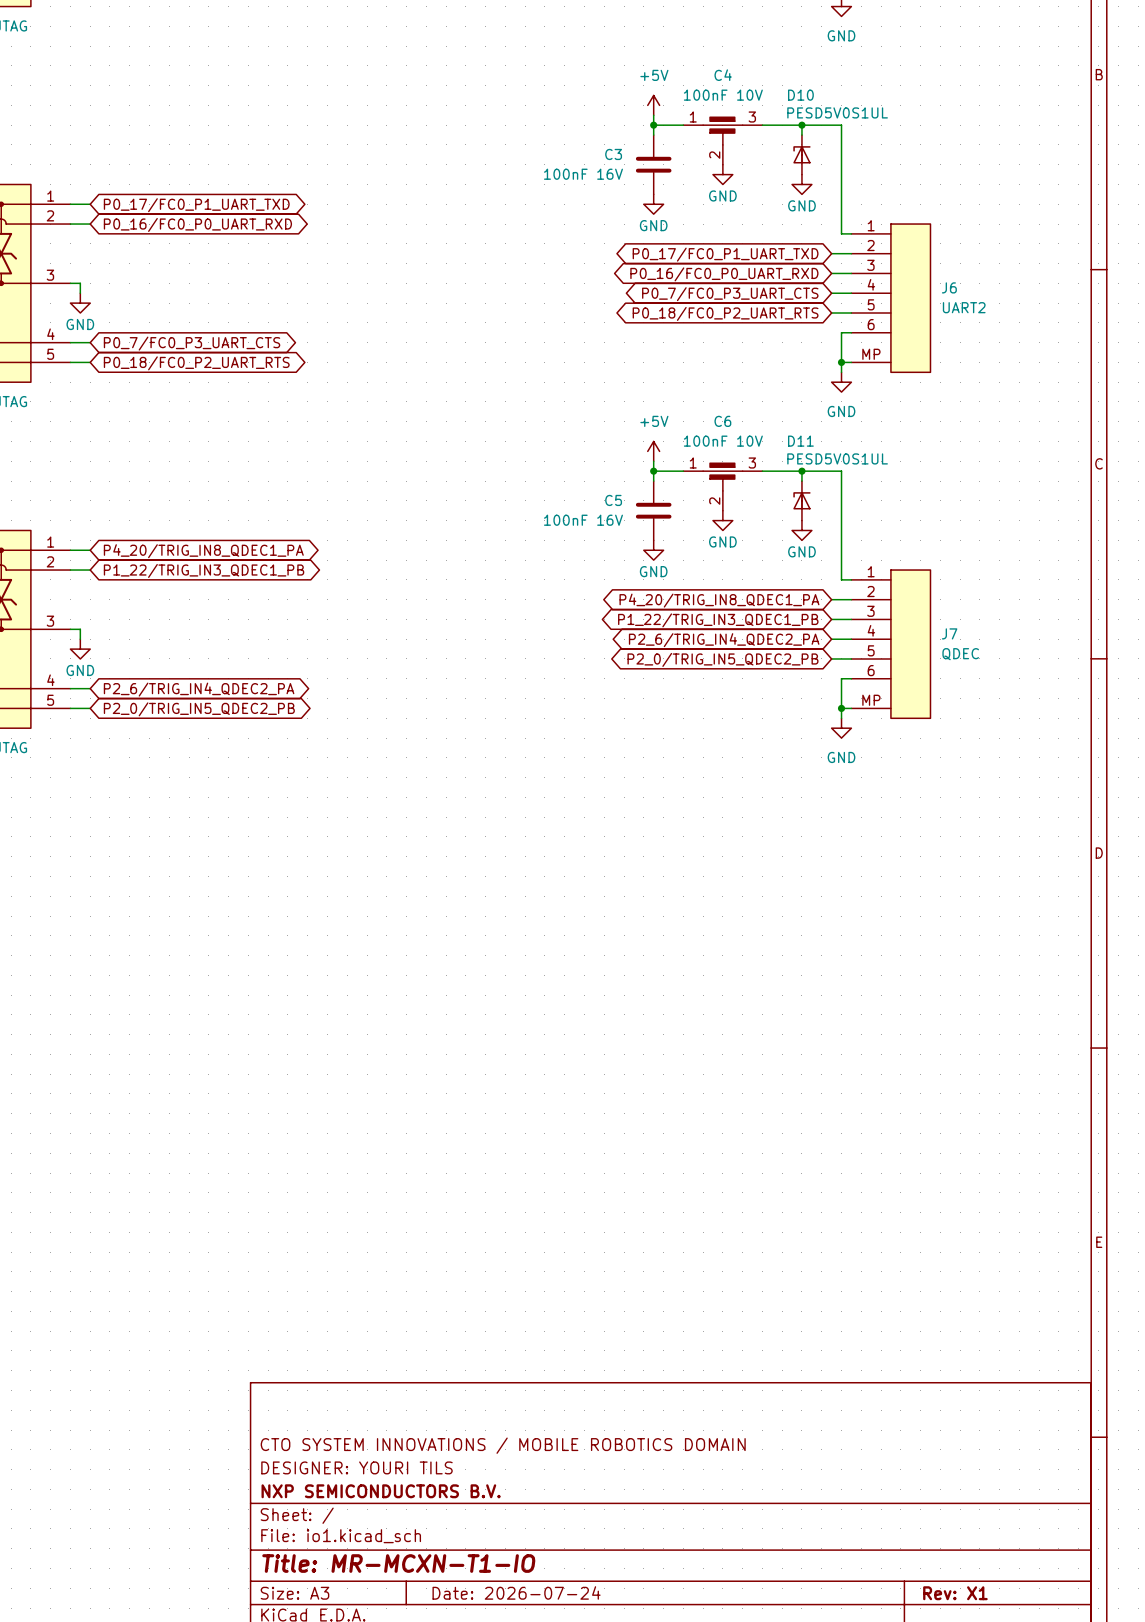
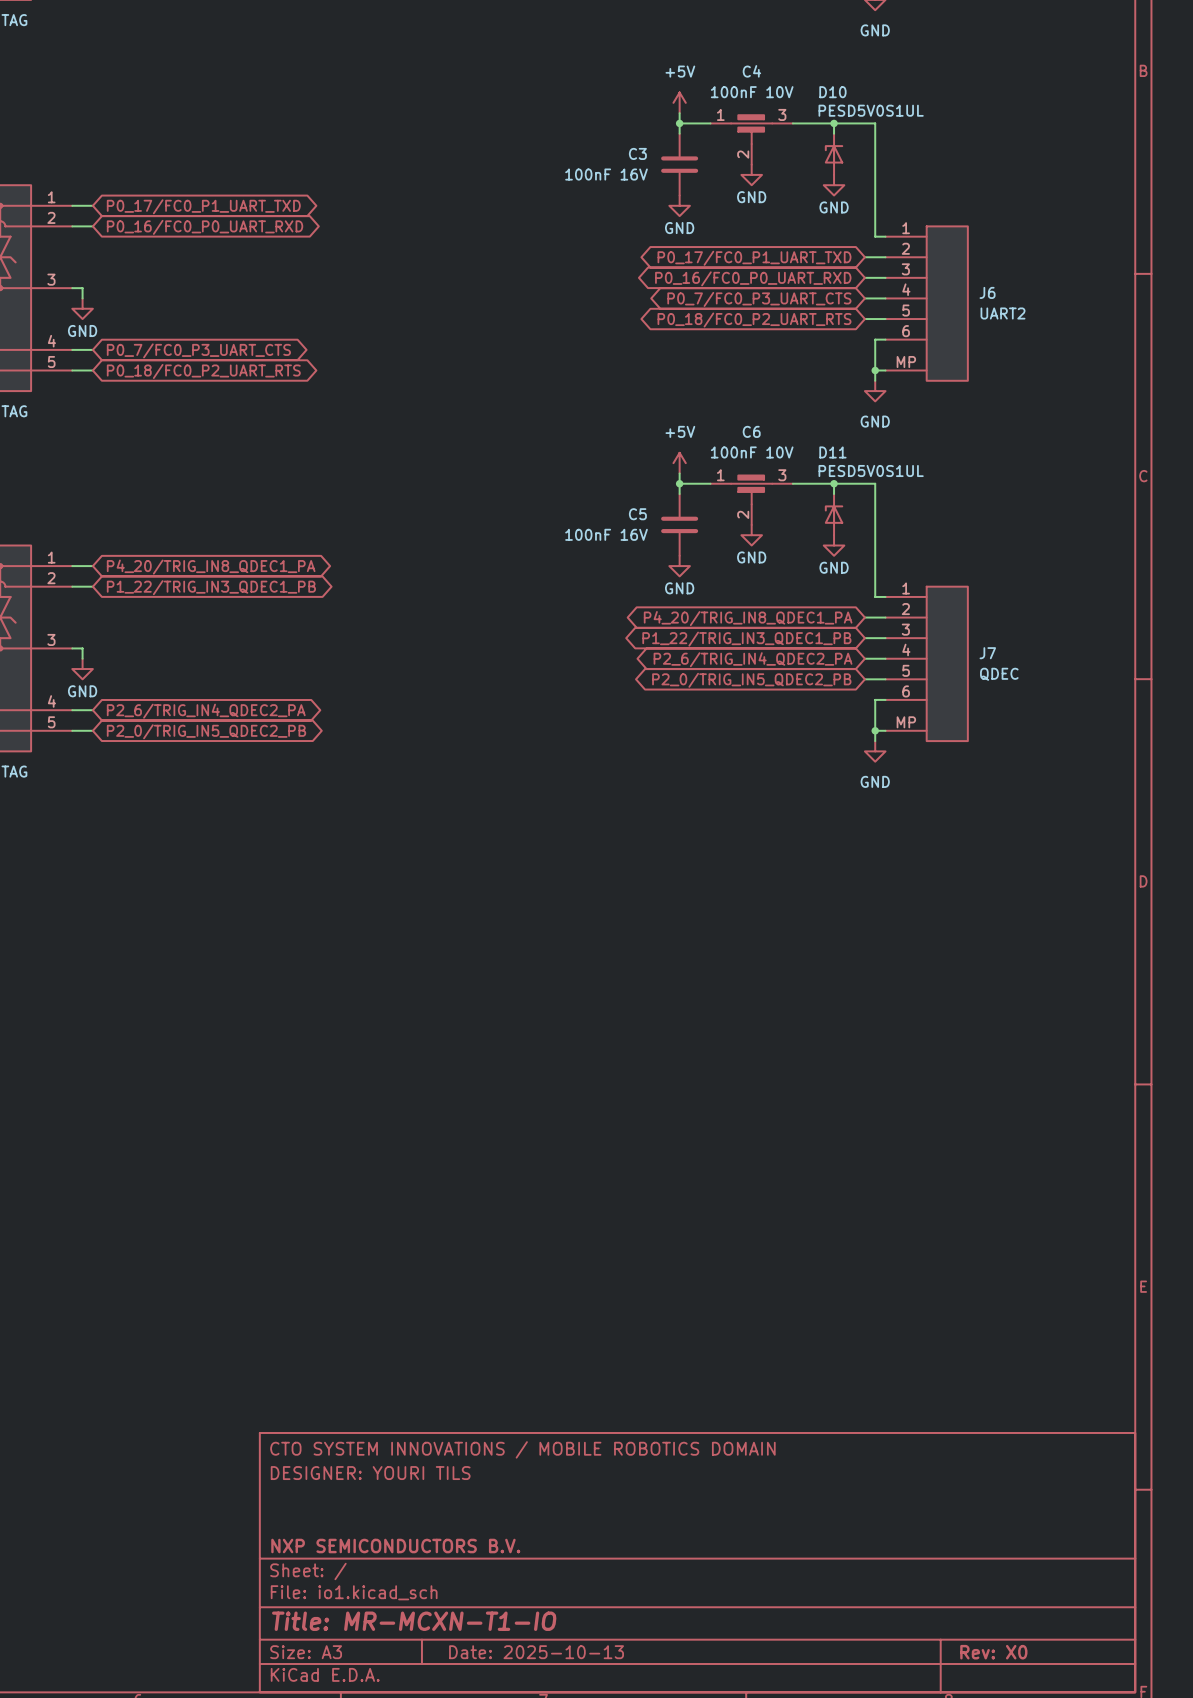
title block position: CTO SYSTEM INNOVATIONS / MOBILE ROBOTICS DOMAIN (503, 1445) -> CTO SYSTEM INNOVATIONS / MOBILE ROBOTICS DOMAIN (522, 1449)
title block position: DESIGNER: YOURI TILS (356, 1467) -> DESIGNER: YOURI TILS (370, 1473)
title block: Date: 2026-07-24 (516, 1592) -> Date: 2025-10-13 (536, 1652)
title block: Rev: X1 (955, 1593) -> Rev: X0 (993, 1652)

